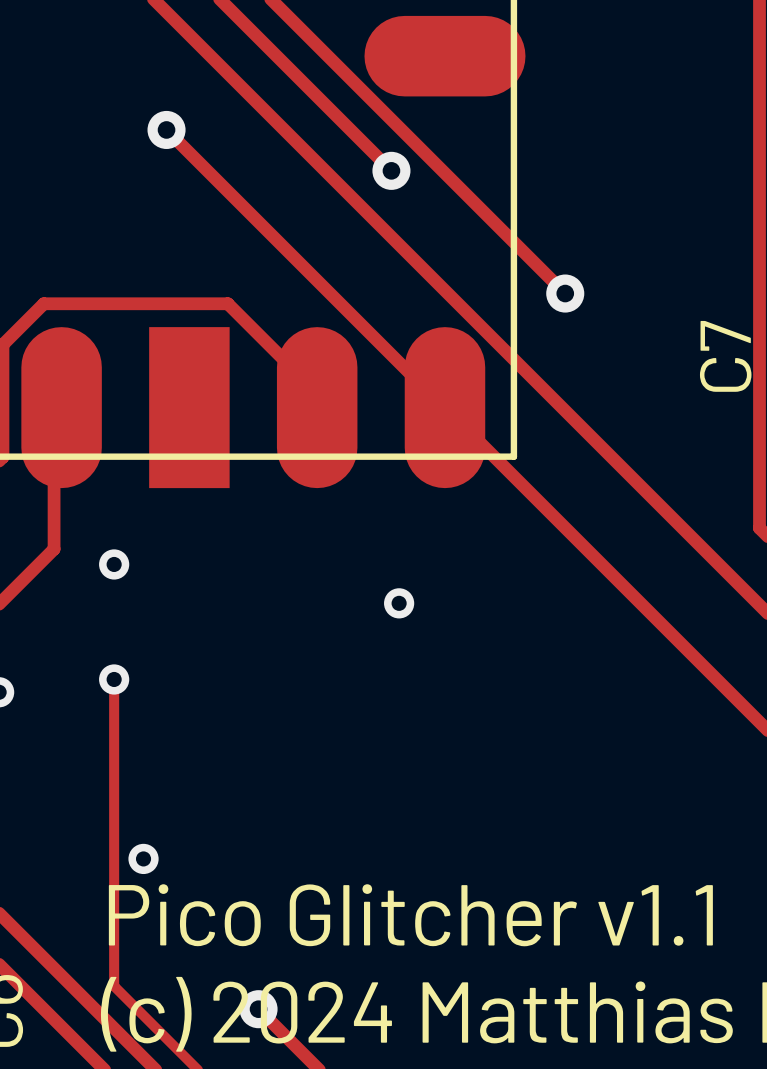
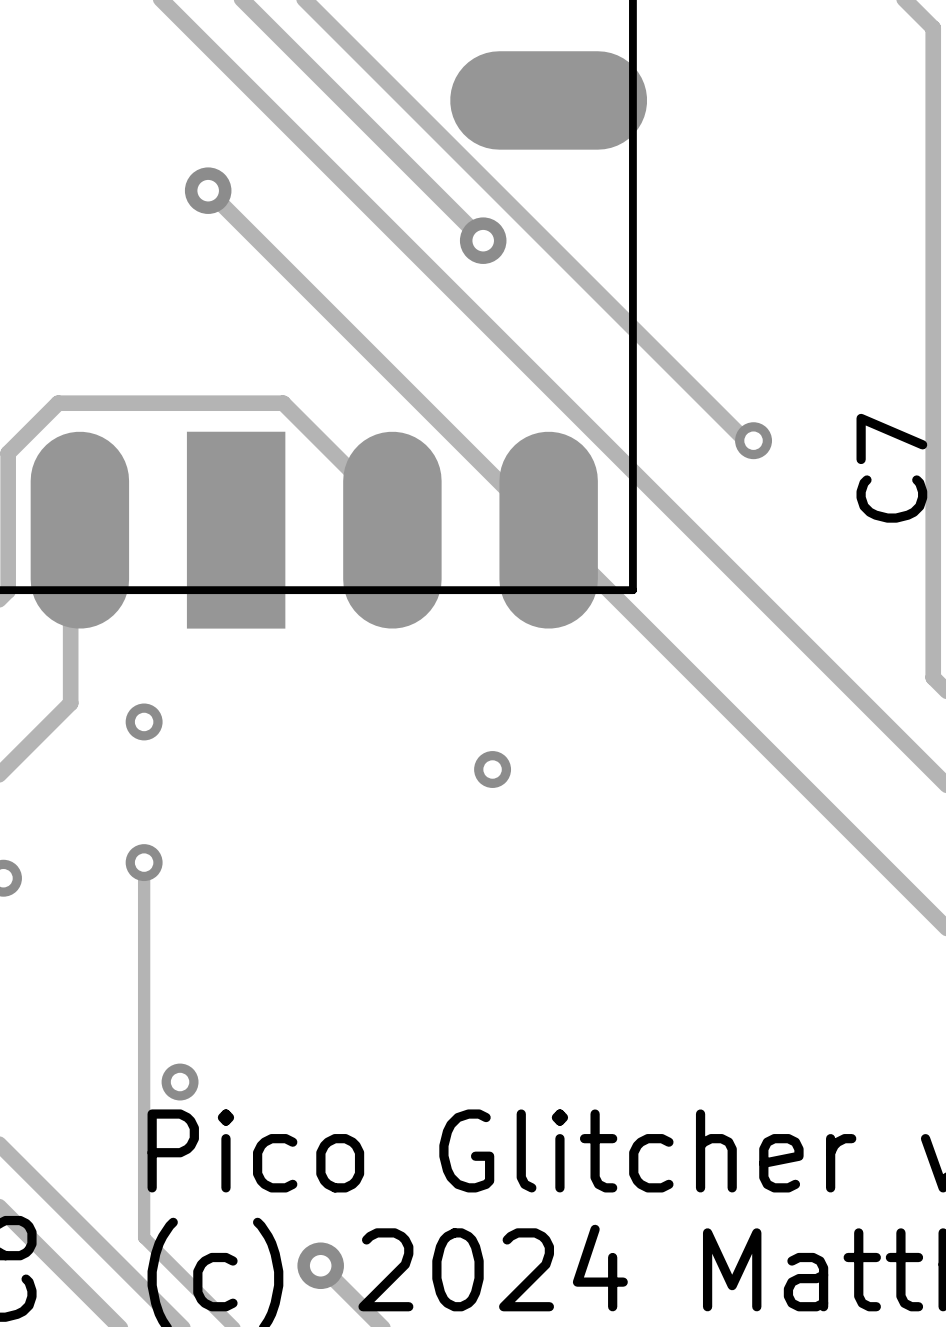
track: none -> (695, 390) (745, 440) (753, 440)
via: (565, 293) -> none
via: none -> (753, 440)

